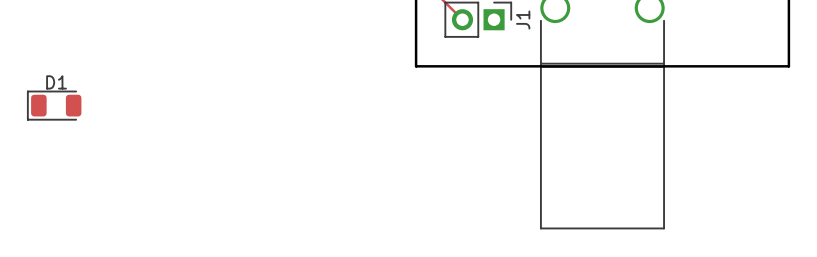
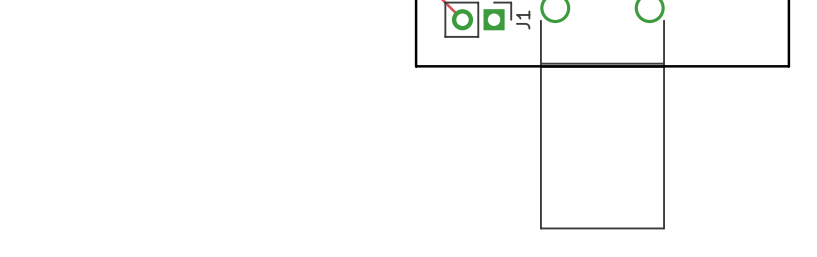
D1: (54, 105) -> none

